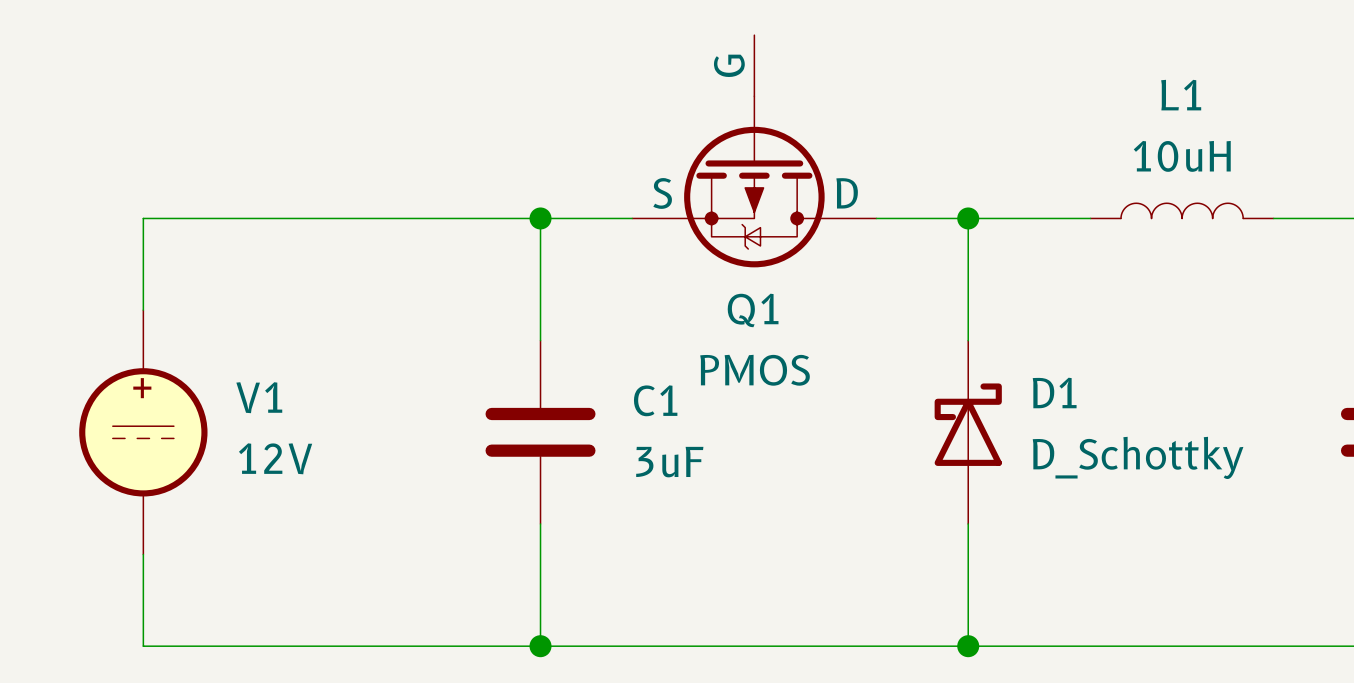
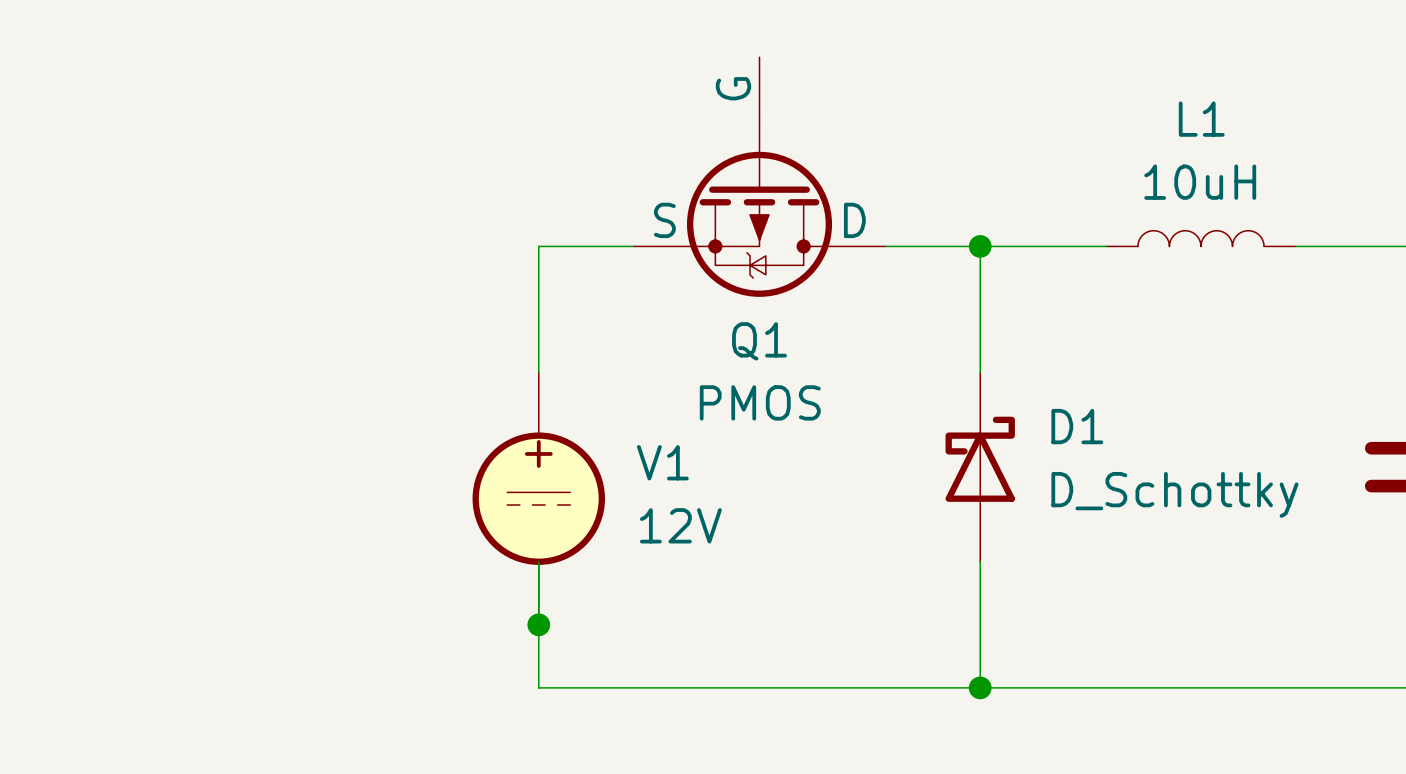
wire: (540, 218) (143, 218) (143, 310) -> none
junction: (540, 218) -> none
V1 position: (143, 432) -> (538, 498)
C1: 3uF (540, 432) -> none
wire: (143, 554) (143, 646) (540, 646) -> none
junction position: (540, 646) -> (538, 624)

